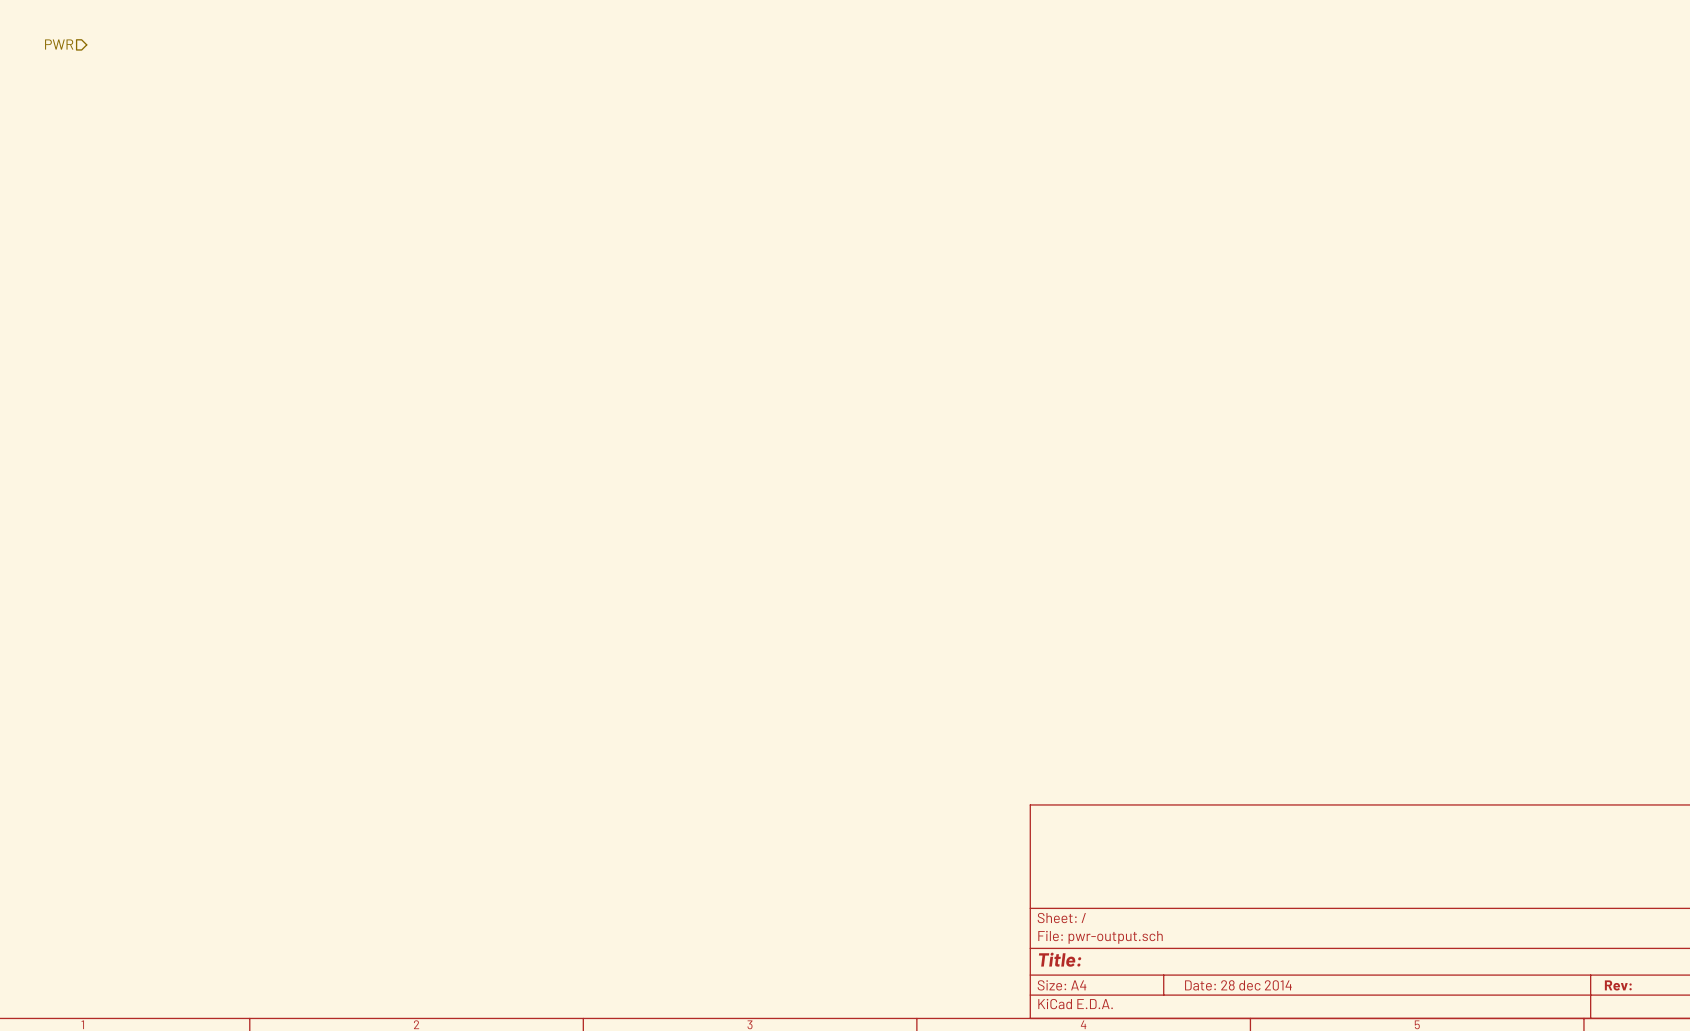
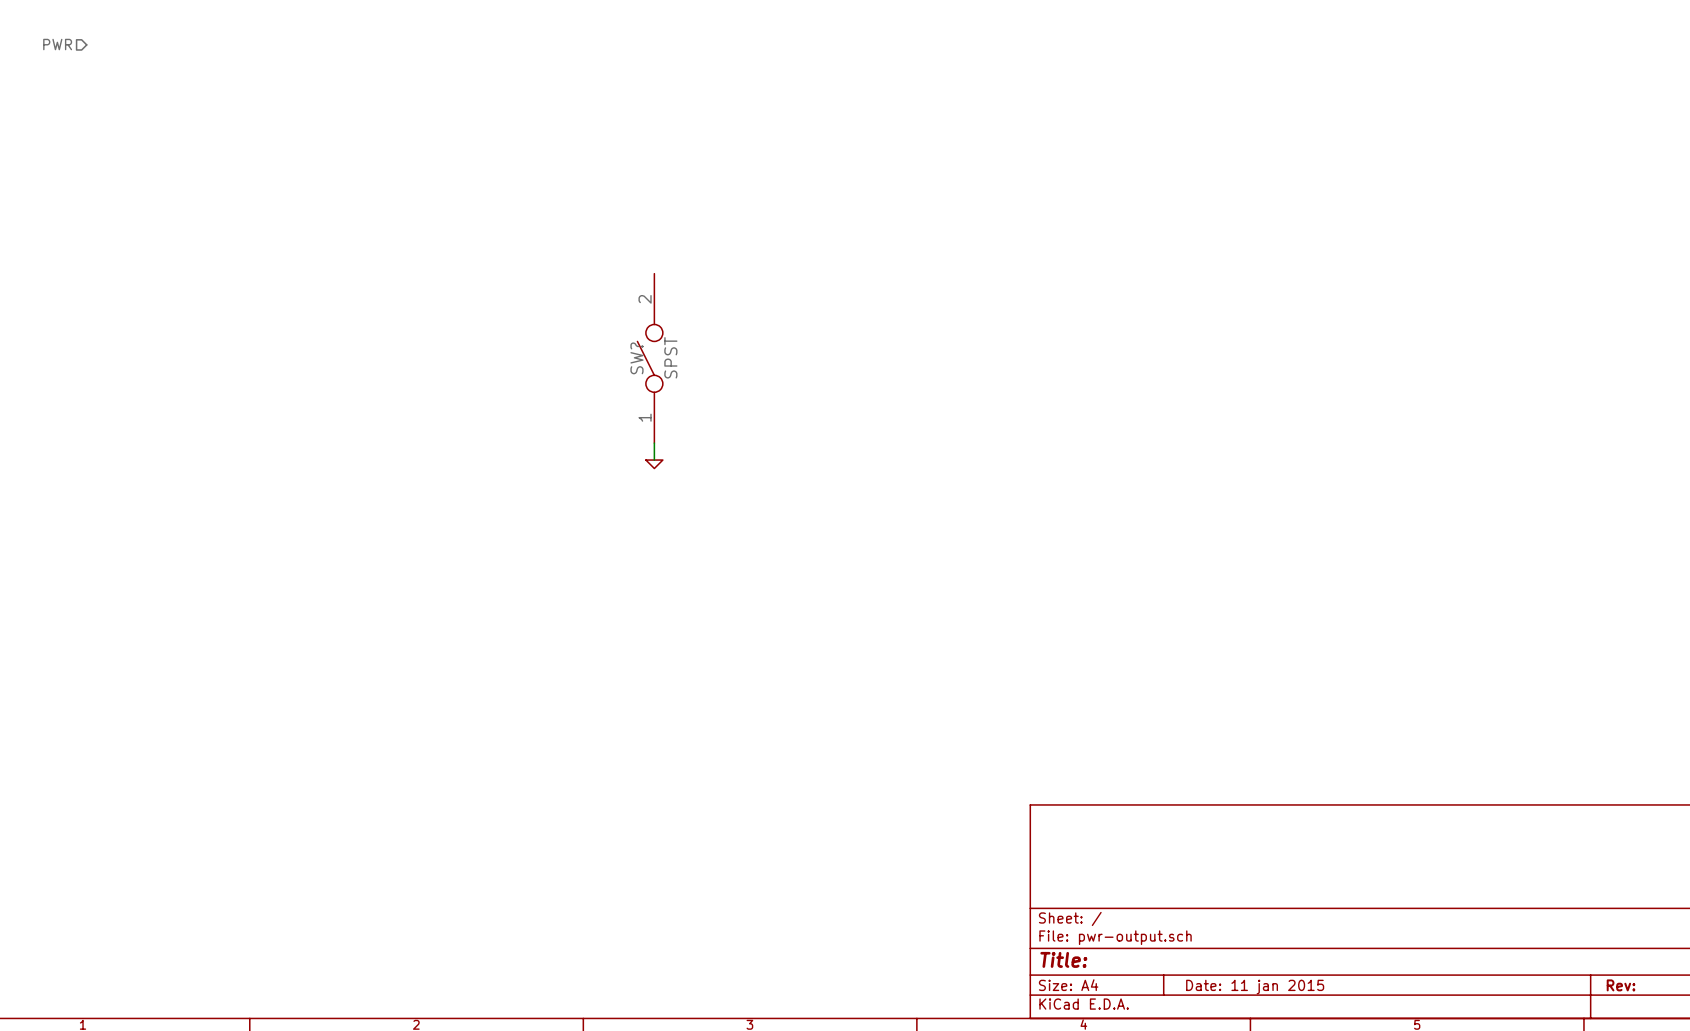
SW?: none -> SPST (650, 358)
wire: none -> (654, 443) (654, 460)
power symbol: none -> (654, 464)
title block: Date: 28 dec 2014 (1238, 985) -> Date: 11 jan 2015 (1255, 987)

